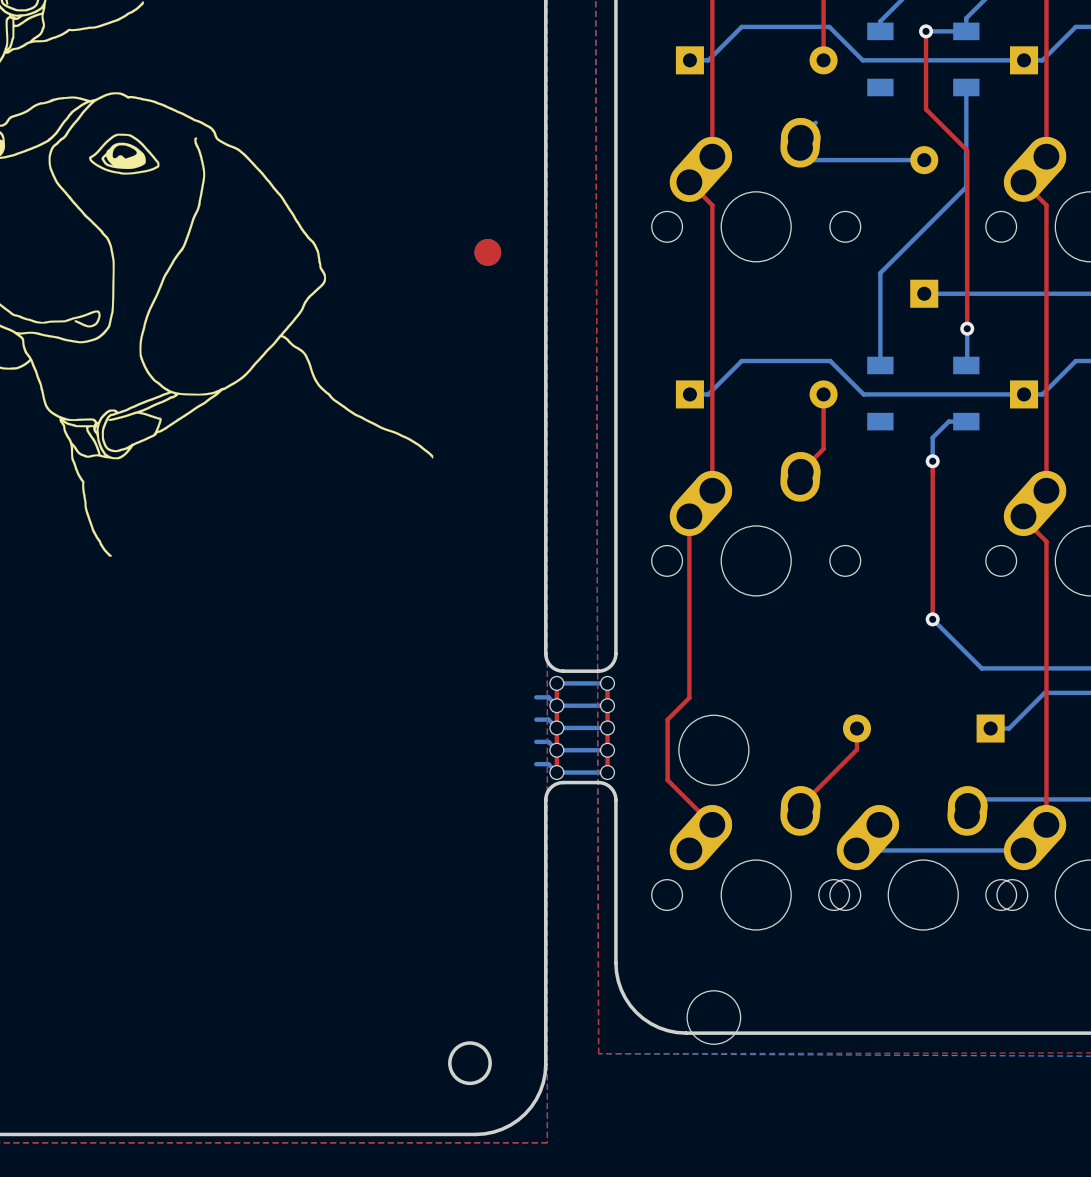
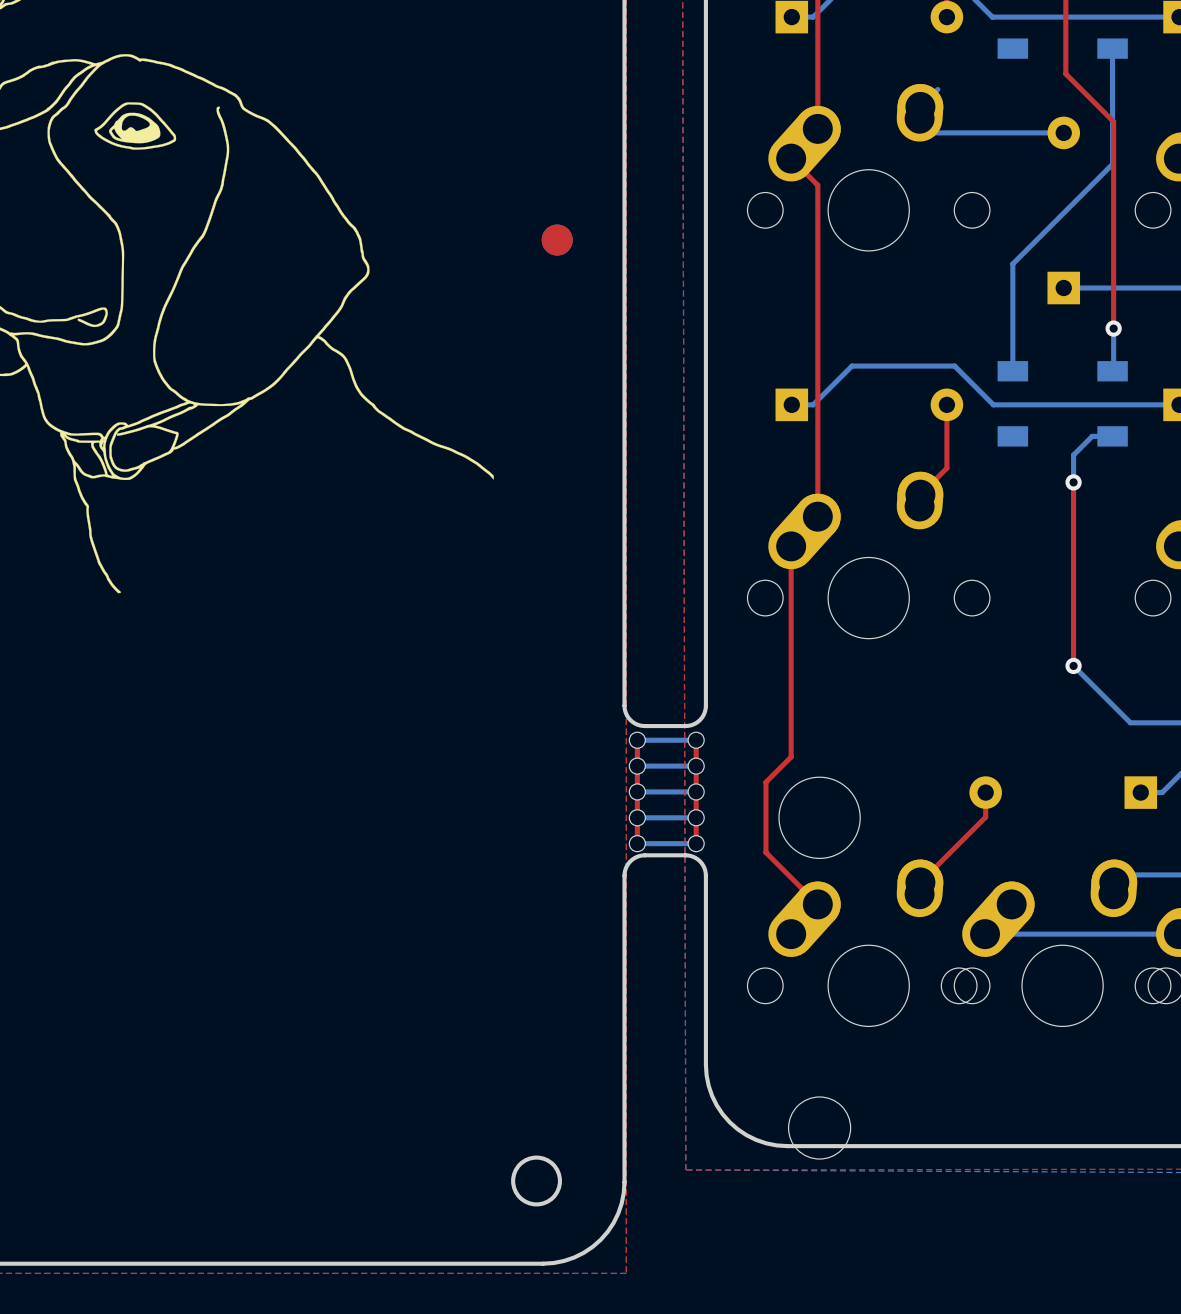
bottom track: (536, 697) (548, 697) (556, 705) -> none
bottom track: (536, 719) (548, 719) (556, 727) -> none
bottom track: (536, 741) (548, 741) (556, 750) -> none
bottom track: (536, 764) (548, 764) (556, 772) -> none

